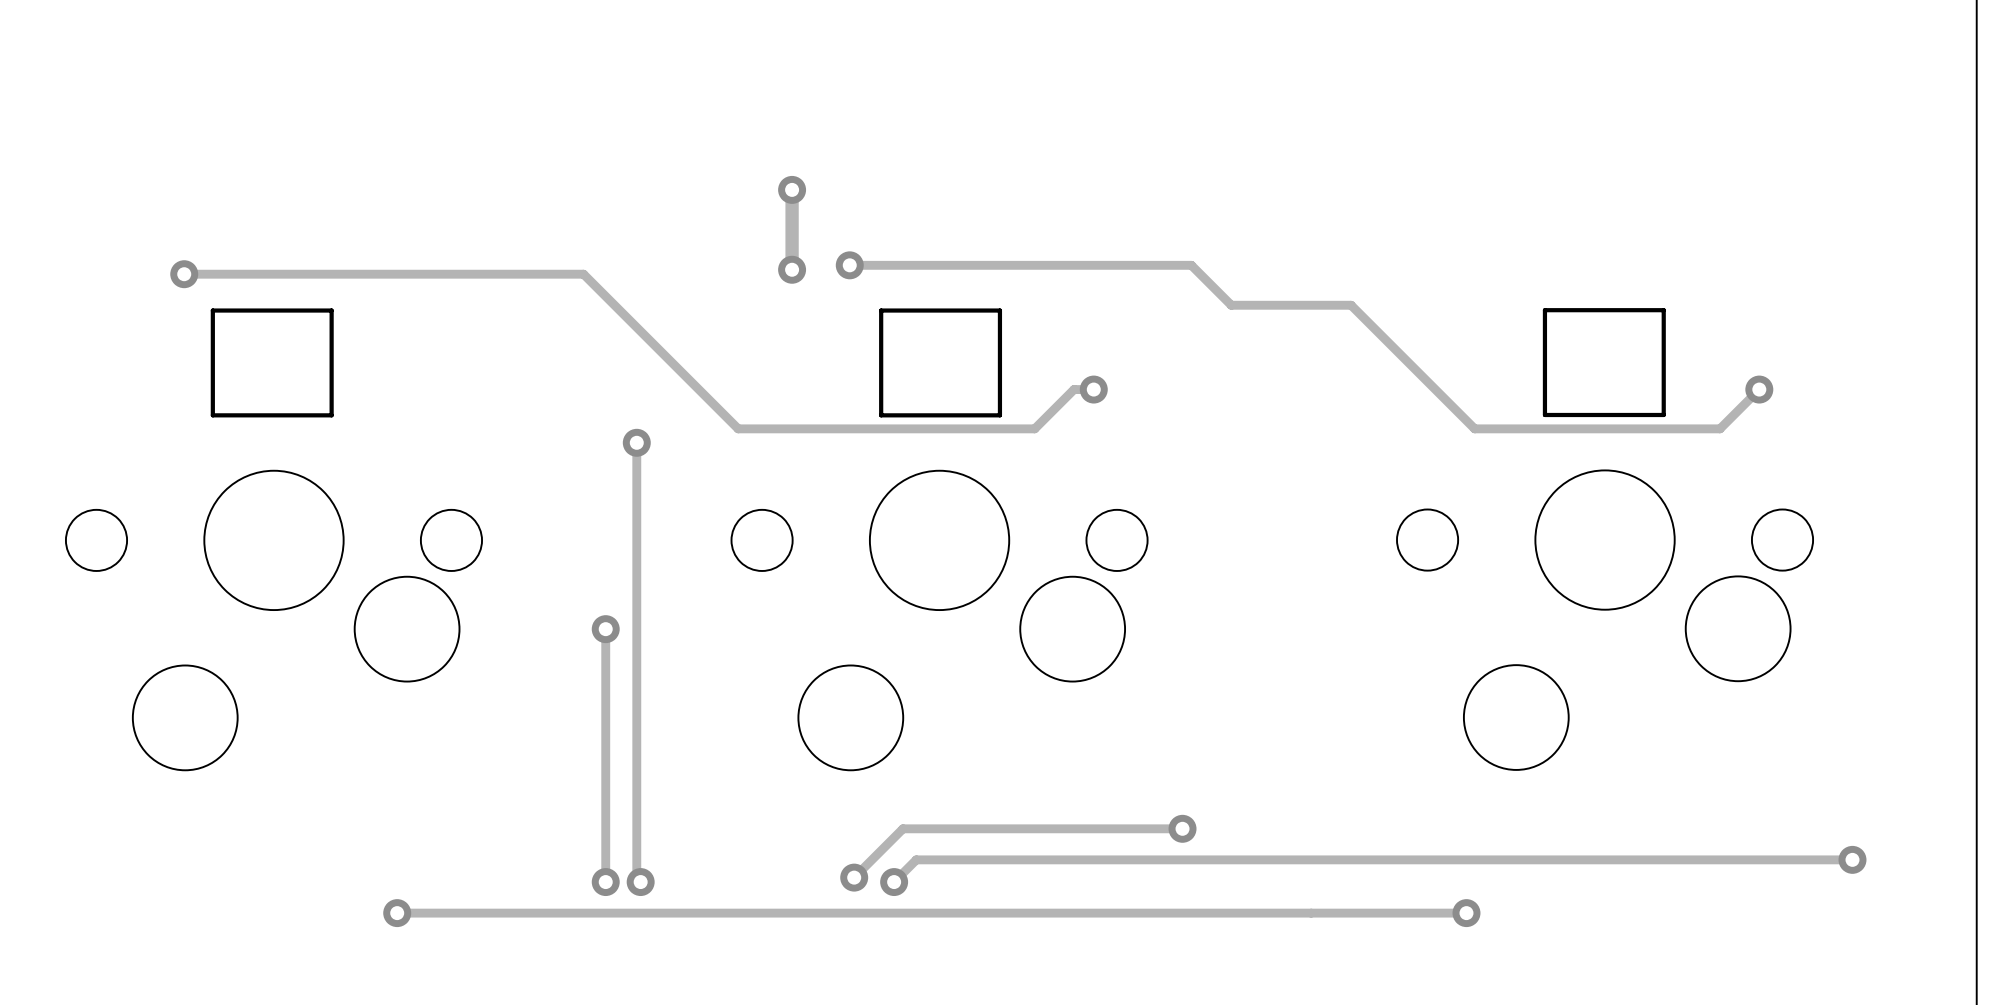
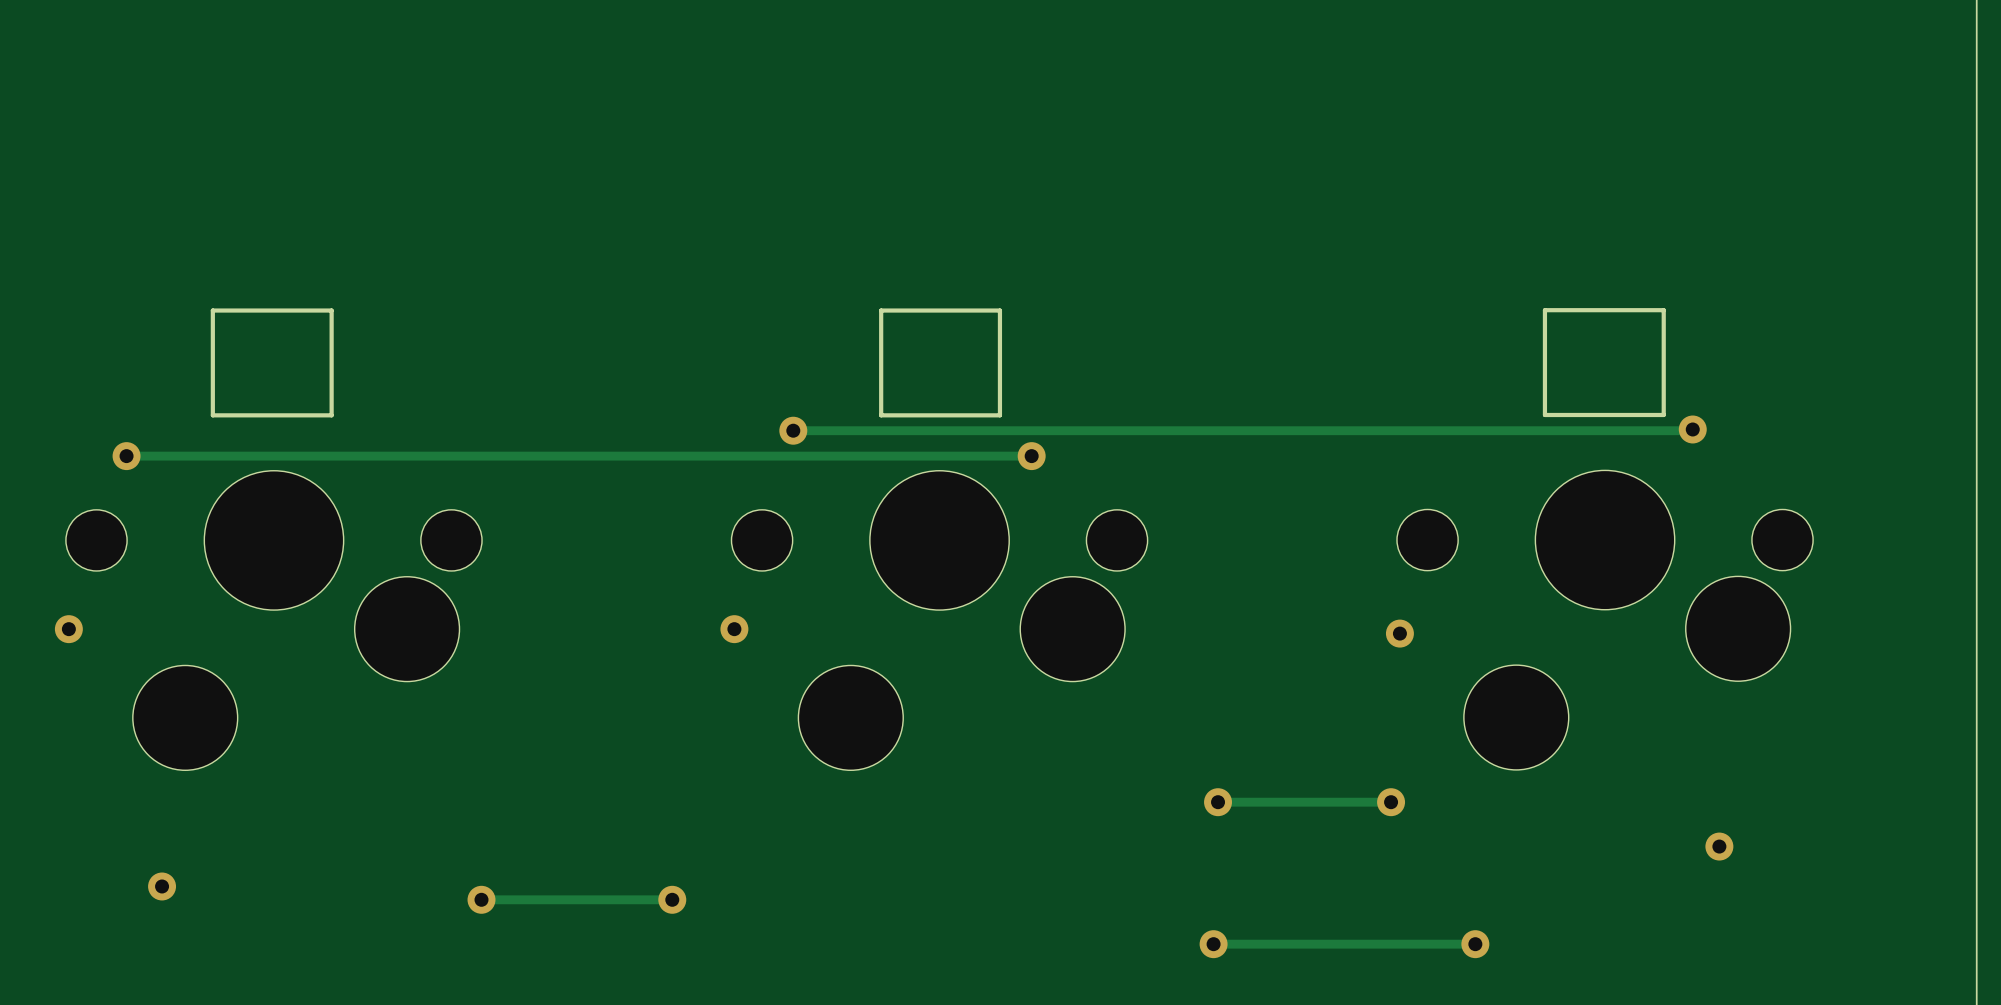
track: (792, 189) (792, 269) -> none
via: (792, 189) -> none
track: (849, 265) (1191, 265) (1231, 305) (1351, 305) (1474, 428) (1720, 428) (1759, 389) -> none
via: (849, 265) -> none
via: (792, 269) -> none
track: (184, 274) (583, 274) (738, 428) (1034, 428) (1074, 389) (1093, 389) -> none
via: (184, 274) -> none
via position: (1093, 389) -> (1031, 456)
via position: (1759, 389) -> (1692, 429)
track: none -> (1692, 429) (793, 430)
via: none -> (793, 430)
track: (636, 442) (636, 878) (640, 882) -> none
via: (636, 442) -> none
track: none -> (126, 456) (1031, 456)
via: none -> (126, 456)
via: none -> (68, 629)
track: (605, 629) (605, 882) -> none
via: (605, 629) -> none
via: none -> (734, 629)
via: none -> (1399, 633)
track: none -> (1218, 802) (1391, 802)
via: none -> (1391, 802)
track: (1182, 828) (903, 828) (854, 877) -> none
via position: (1182, 828) -> (1218, 802)
via: none -> (1719, 846)
track: (1852, 859) (916, 859) (894, 882) -> none
via: (1852, 859) -> none
via: (854, 877) -> none
via: (605, 882) -> none
via: (640, 882) -> none
via: (894, 882) -> none
via: none -> (162, 886)
track: none -> (481, 899) (672, 899)
via: none -> (481, 899)
via: none -> (672, 899)
track: (397, 913) (1466, 913) -> none
via: (397, 913) -> none
via position: (1466, 913) -> (1475, 944)
track: none -> (1213, 944) (1475, 944)
via: none -> (1213, 944)

